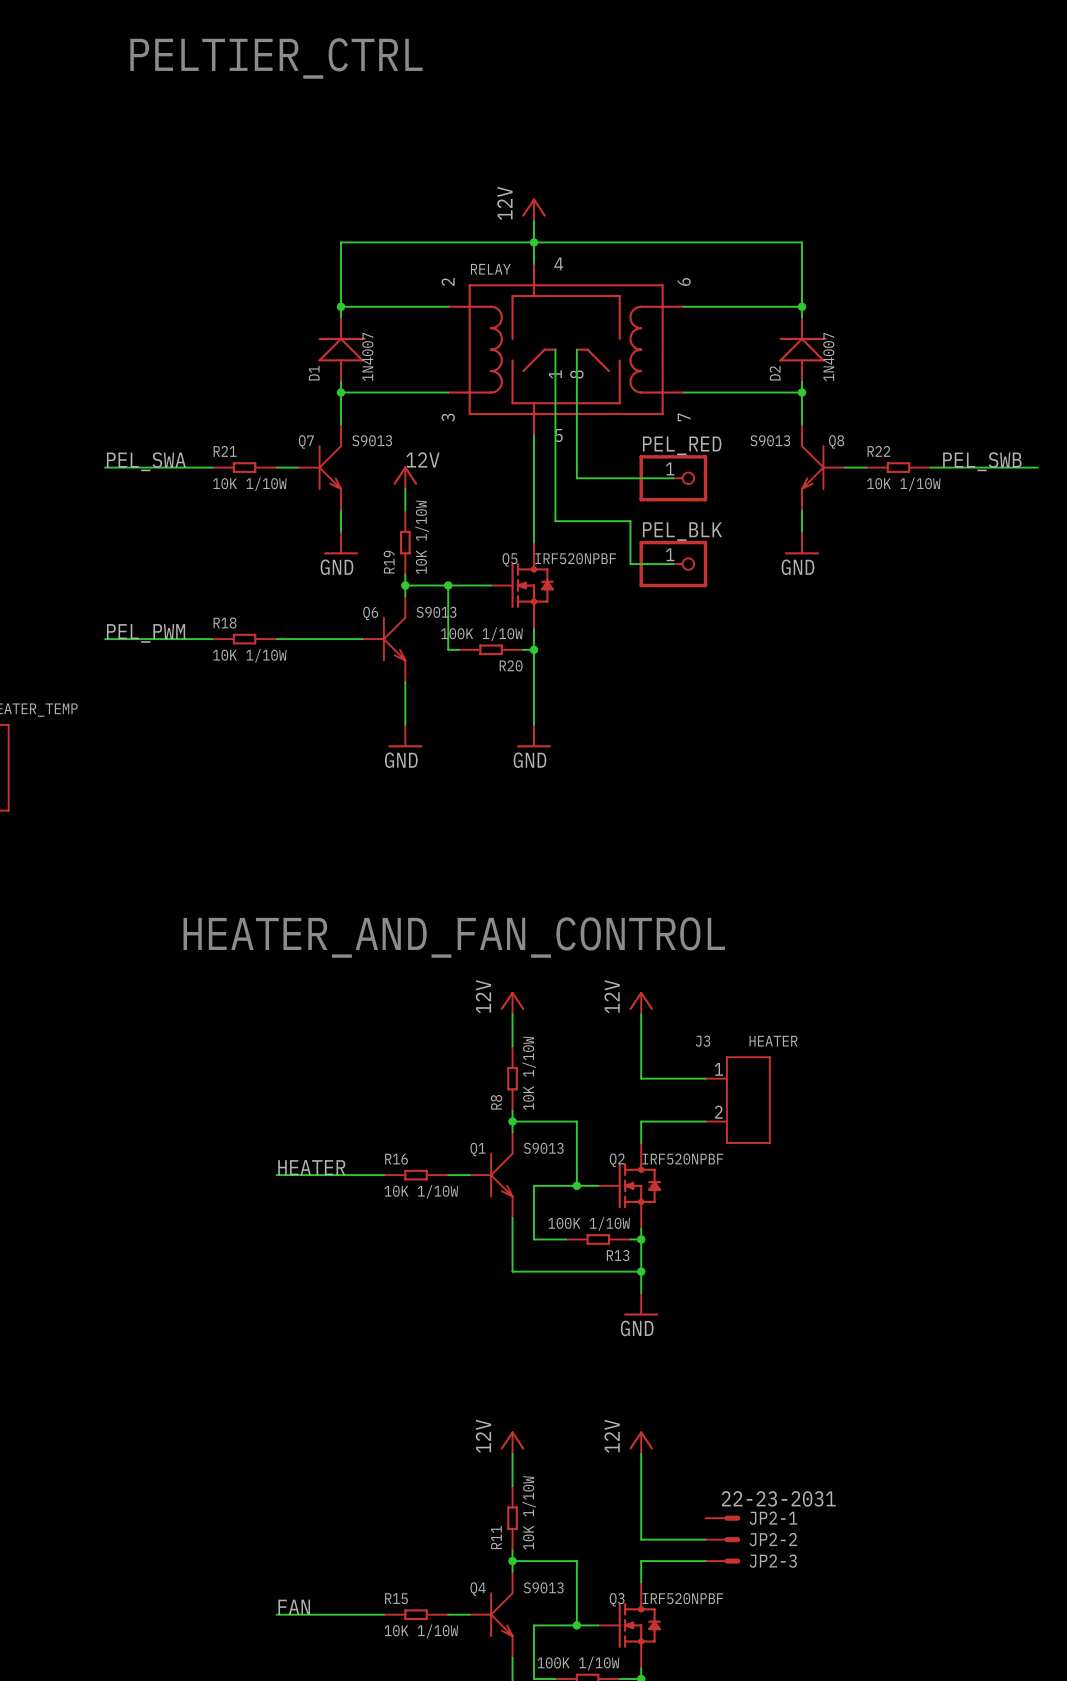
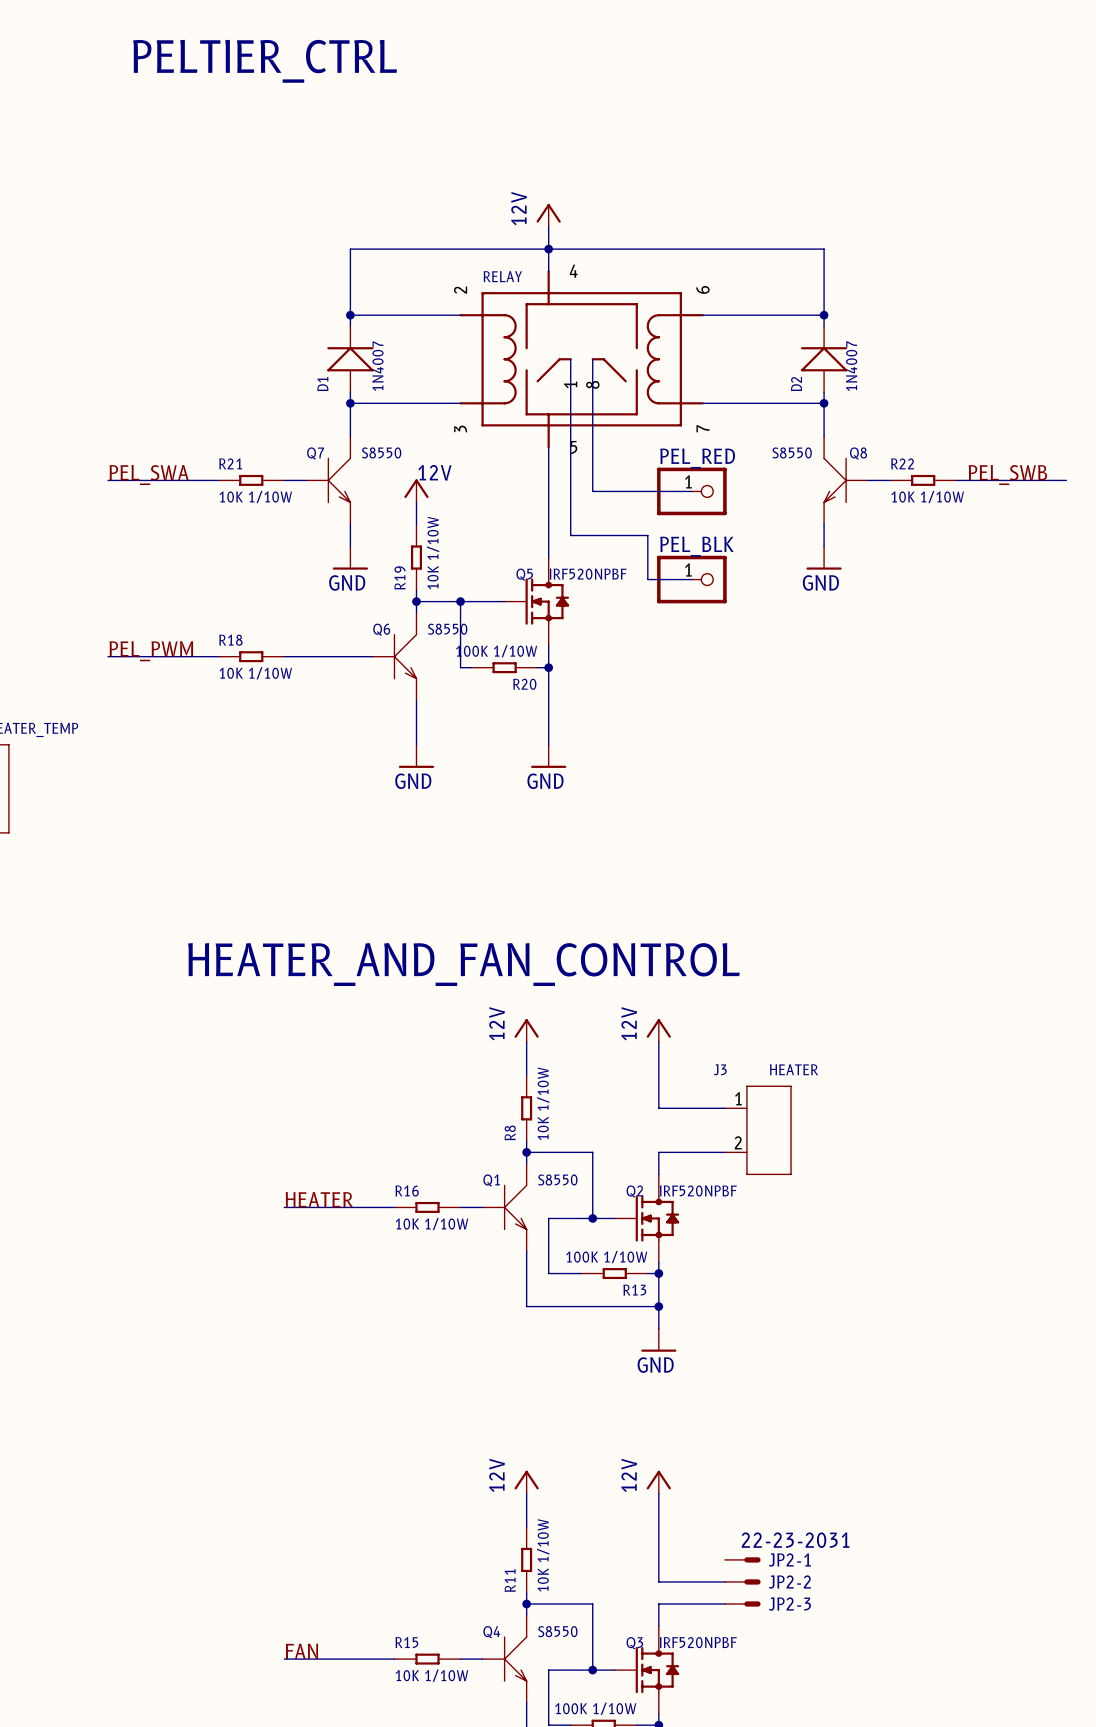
Q7 value: S9013 (372, 440) -> S8550 (381, 452)
Q8 value: S9013 (770, 440) -> S8550 (792, 452)
Q6 value: S9013 (436, 612) -> S8550 (447, 629)
Q1 value: S9013 (543, 1148) -> S8550 (557, 1179)
Q4 value: S9013 (543, 1587) -> S8550 (557, 1631)

